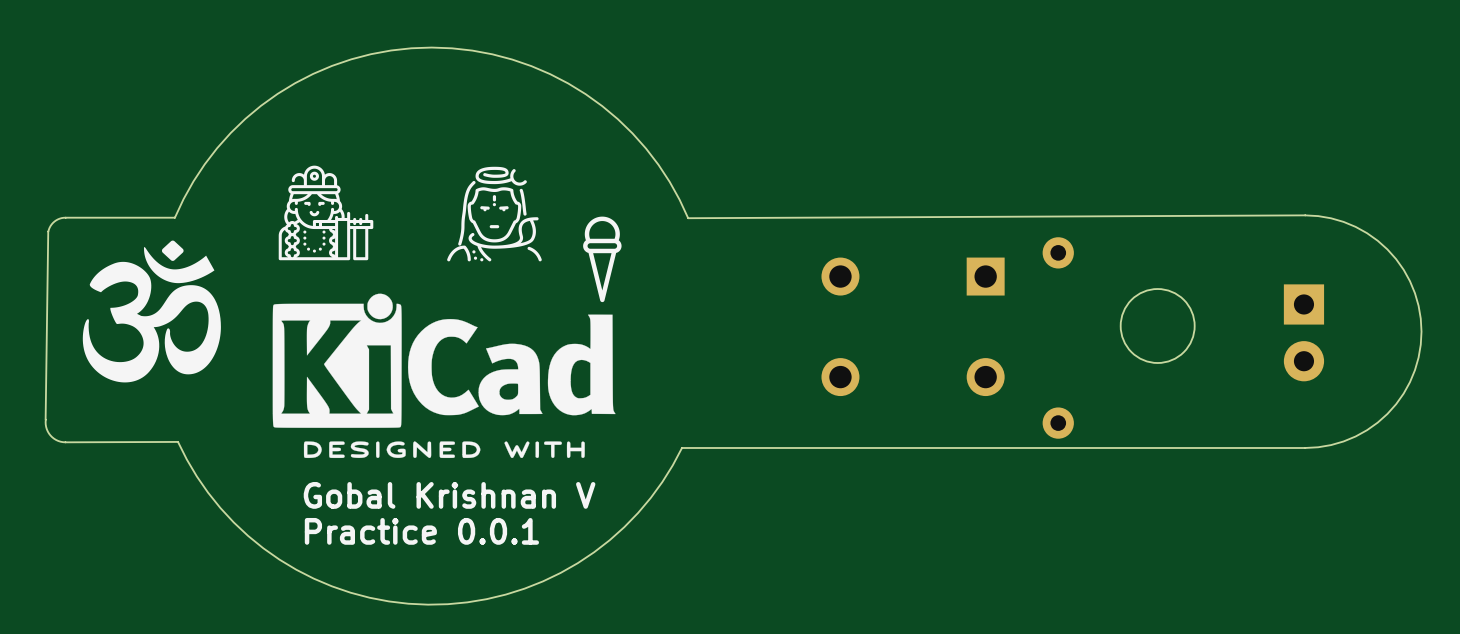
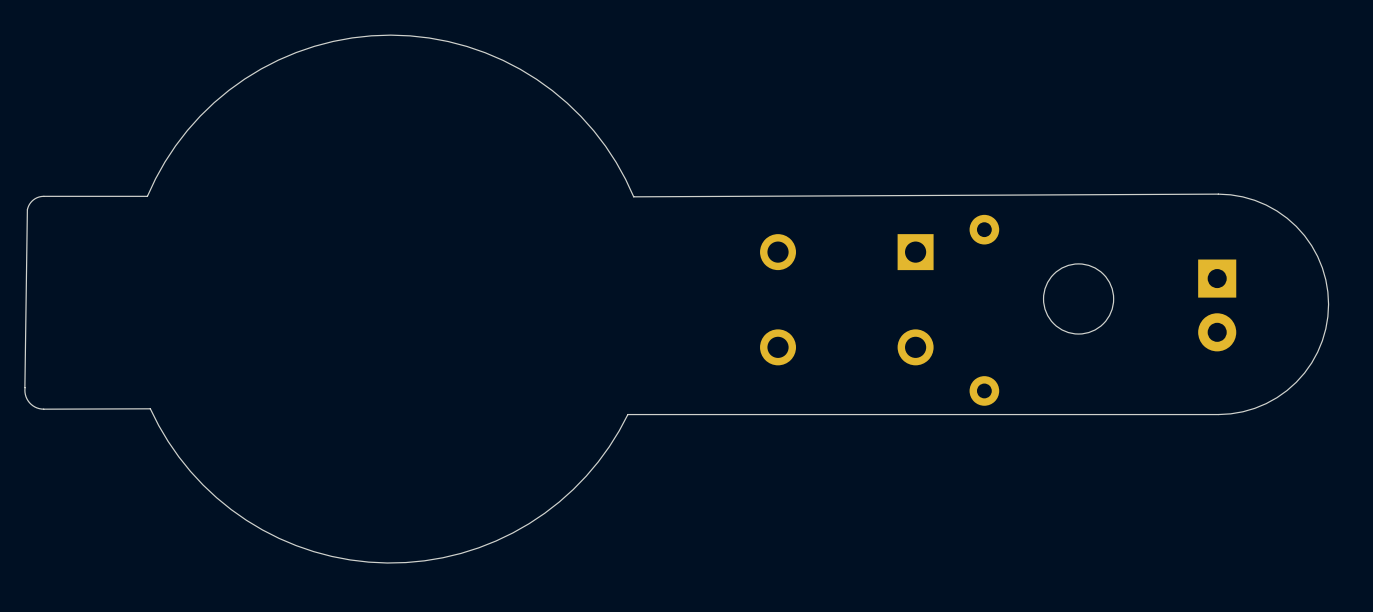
drawing: [278, 165, 374, 261] -> none
drawing: [447, 166, 542, 262] -> none
drawing: [272, 216, 622, 459] -> none
drawing: [82, 240, 221, 383] -> none
text: Gobal Krishnan V (449, 495) -> none
text: Practice 0.0.1 (421, 531) -> none

